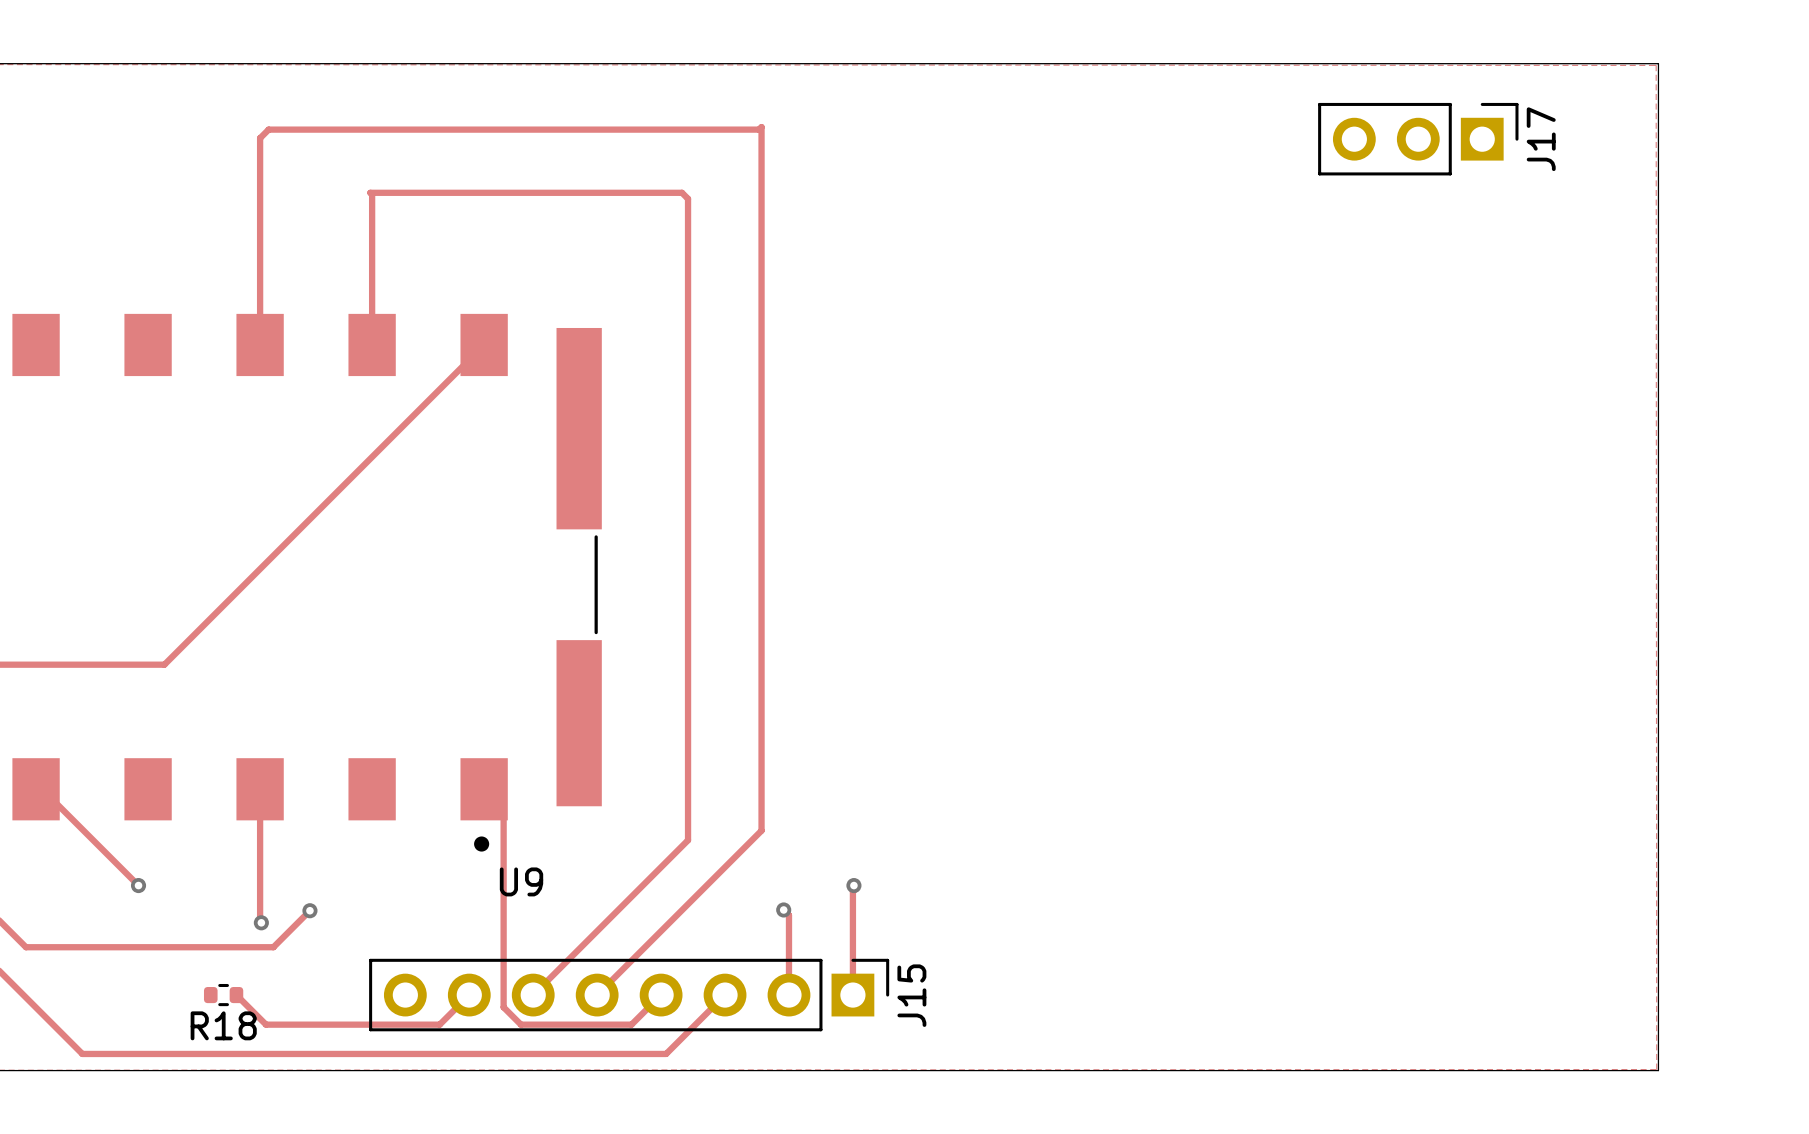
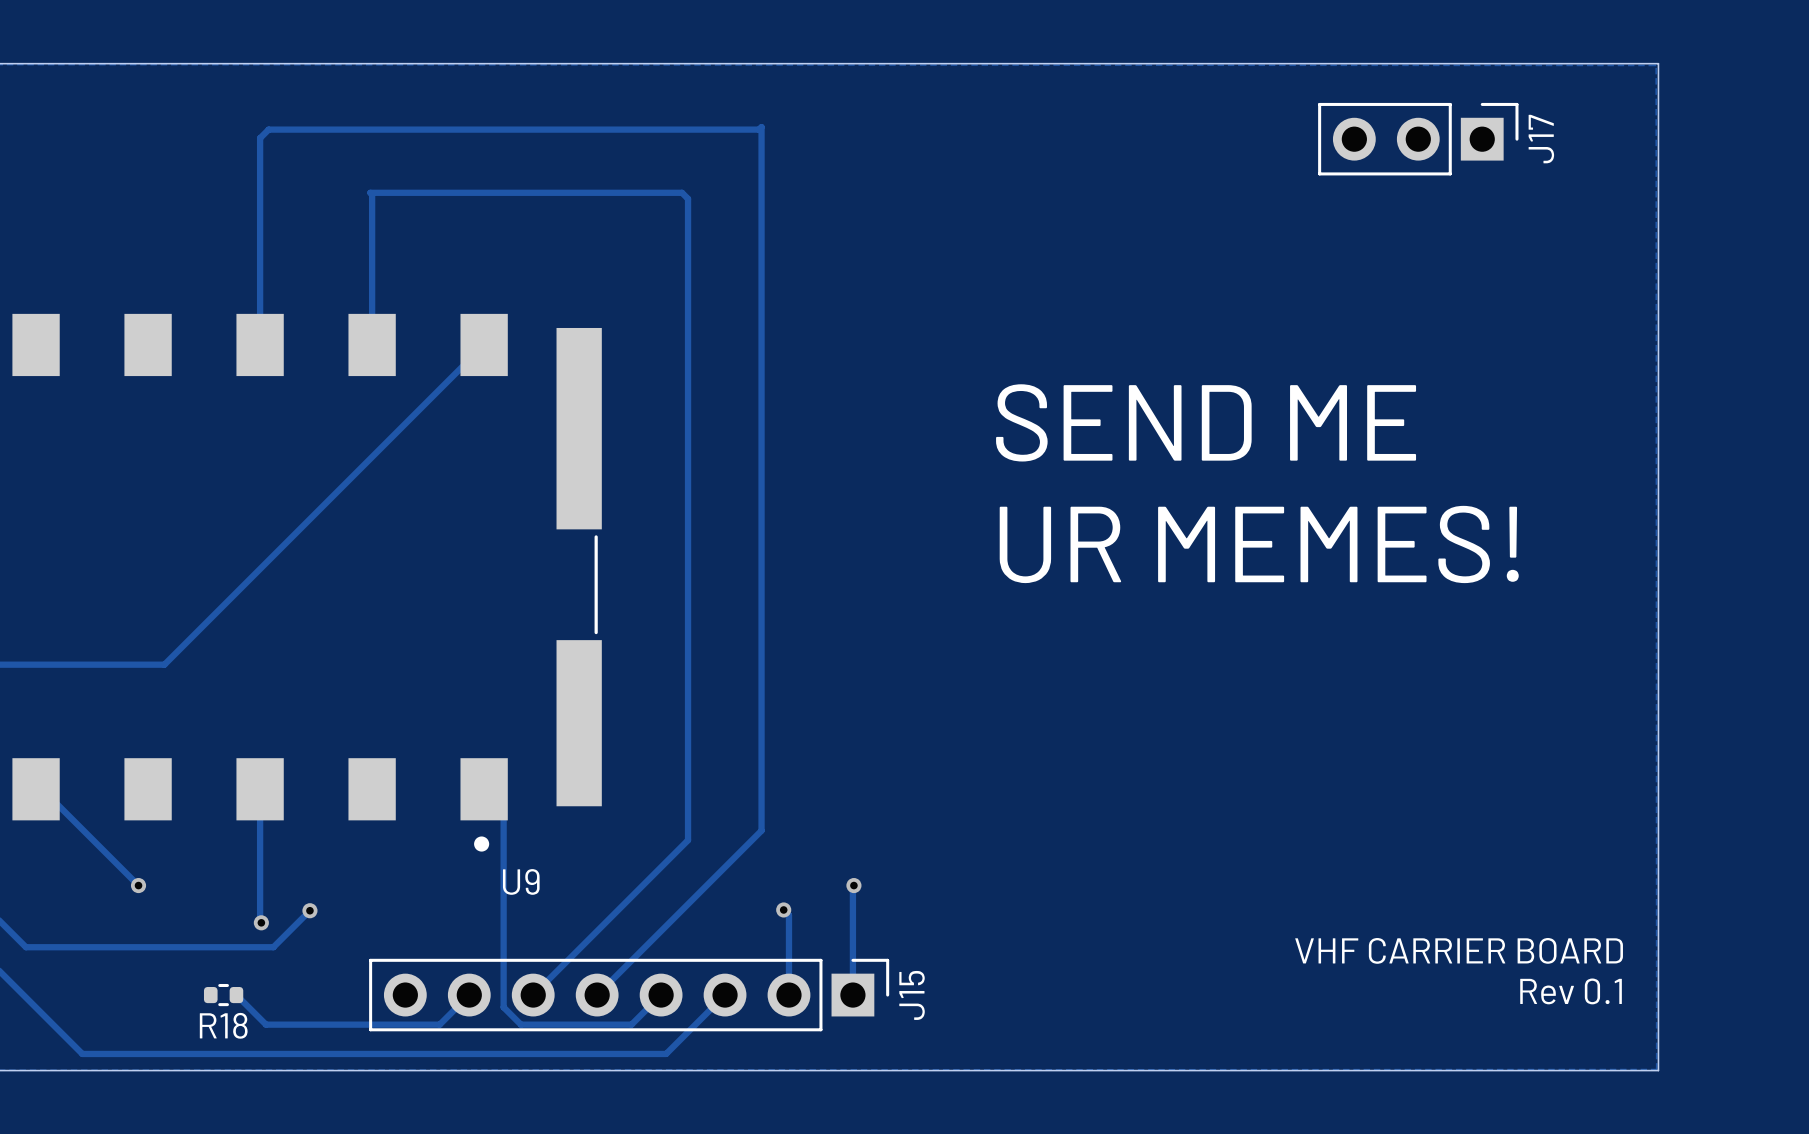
text: none -> SEND ME (1206, 422)
text: none -> UR MEMES! (1259, 544)
text: none -> VHF CARRIER BOARD (1459, 950)
text: none -> Rev 0.1 (1571, 991)

